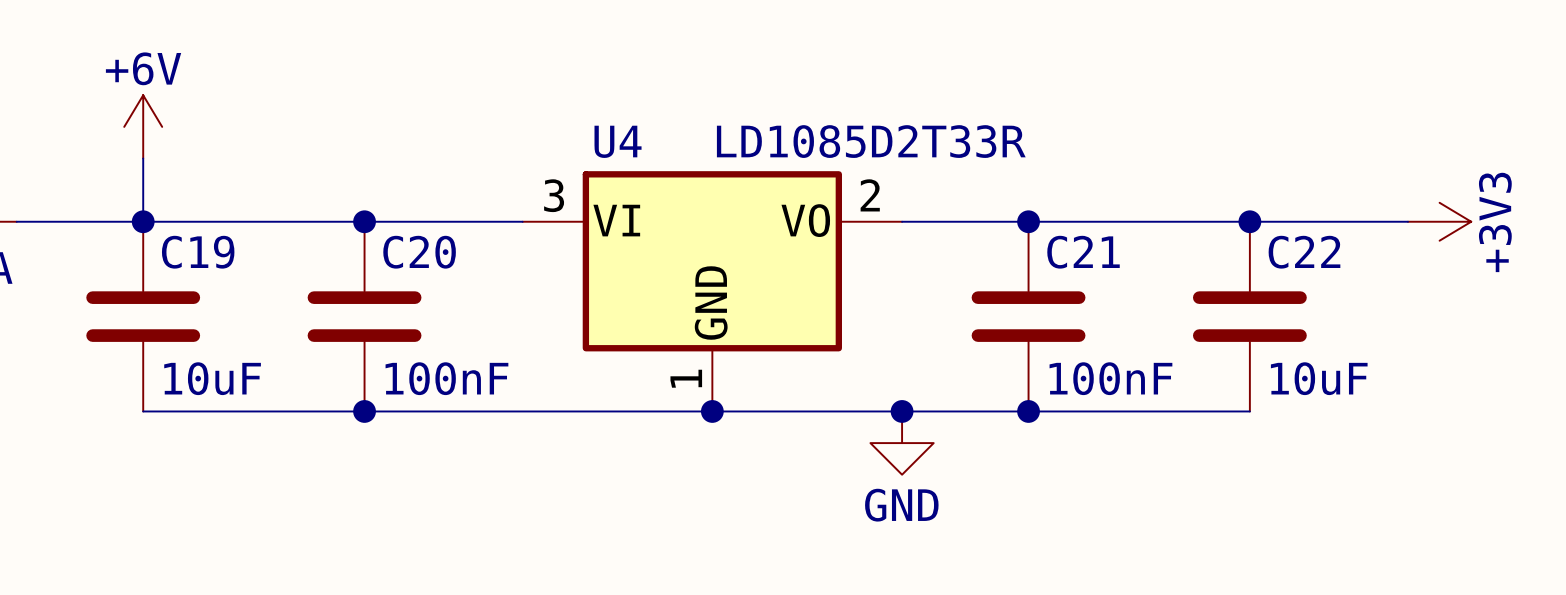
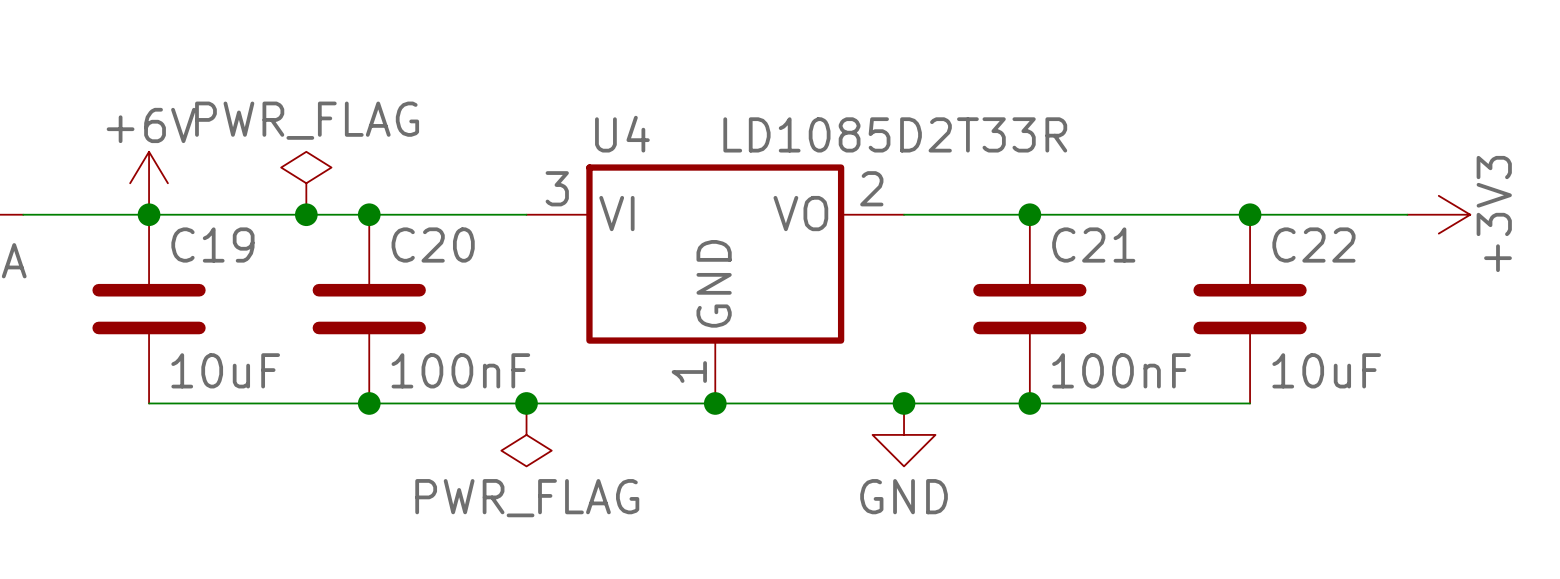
power symbol position: +6V (143, 126) -> +6V (149, 183)
power symbol: none -> PWR_FLAG (306, 183)
junction: none -> (306, 214)
junction: none -> (526, 403)
power symbol: none -> PWR_FLAG (526, 434)

